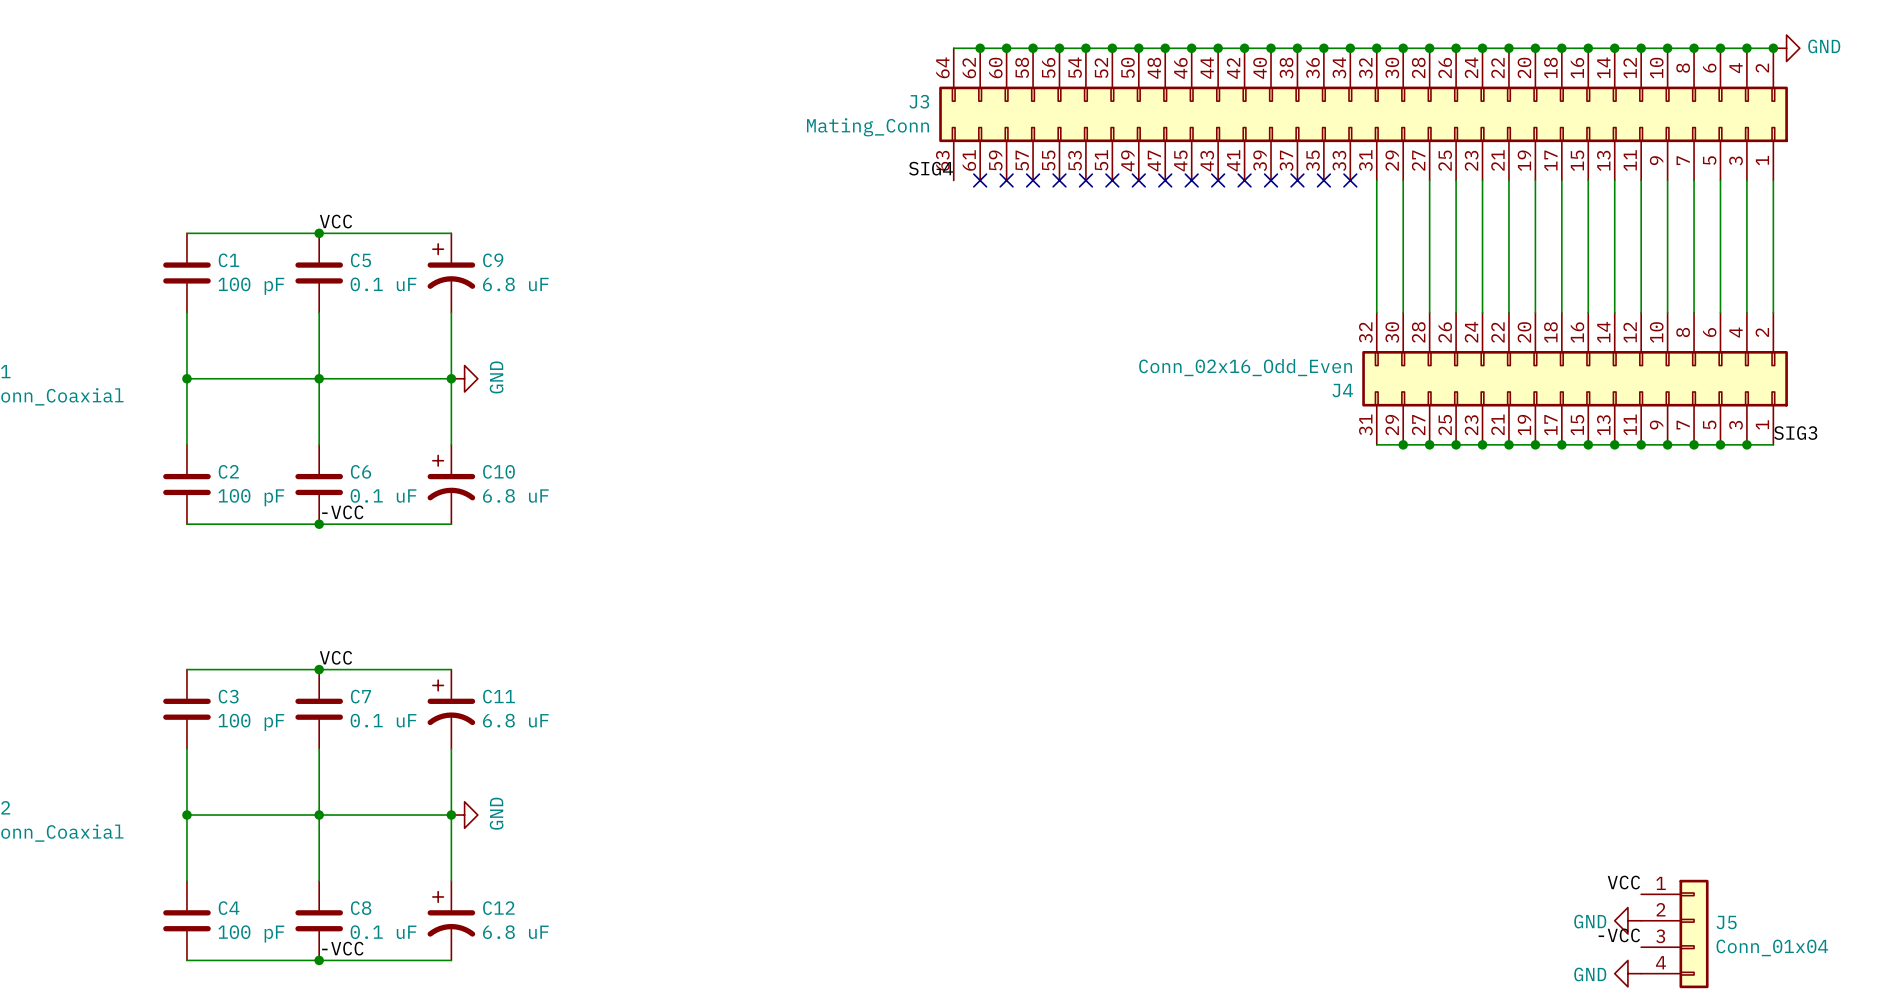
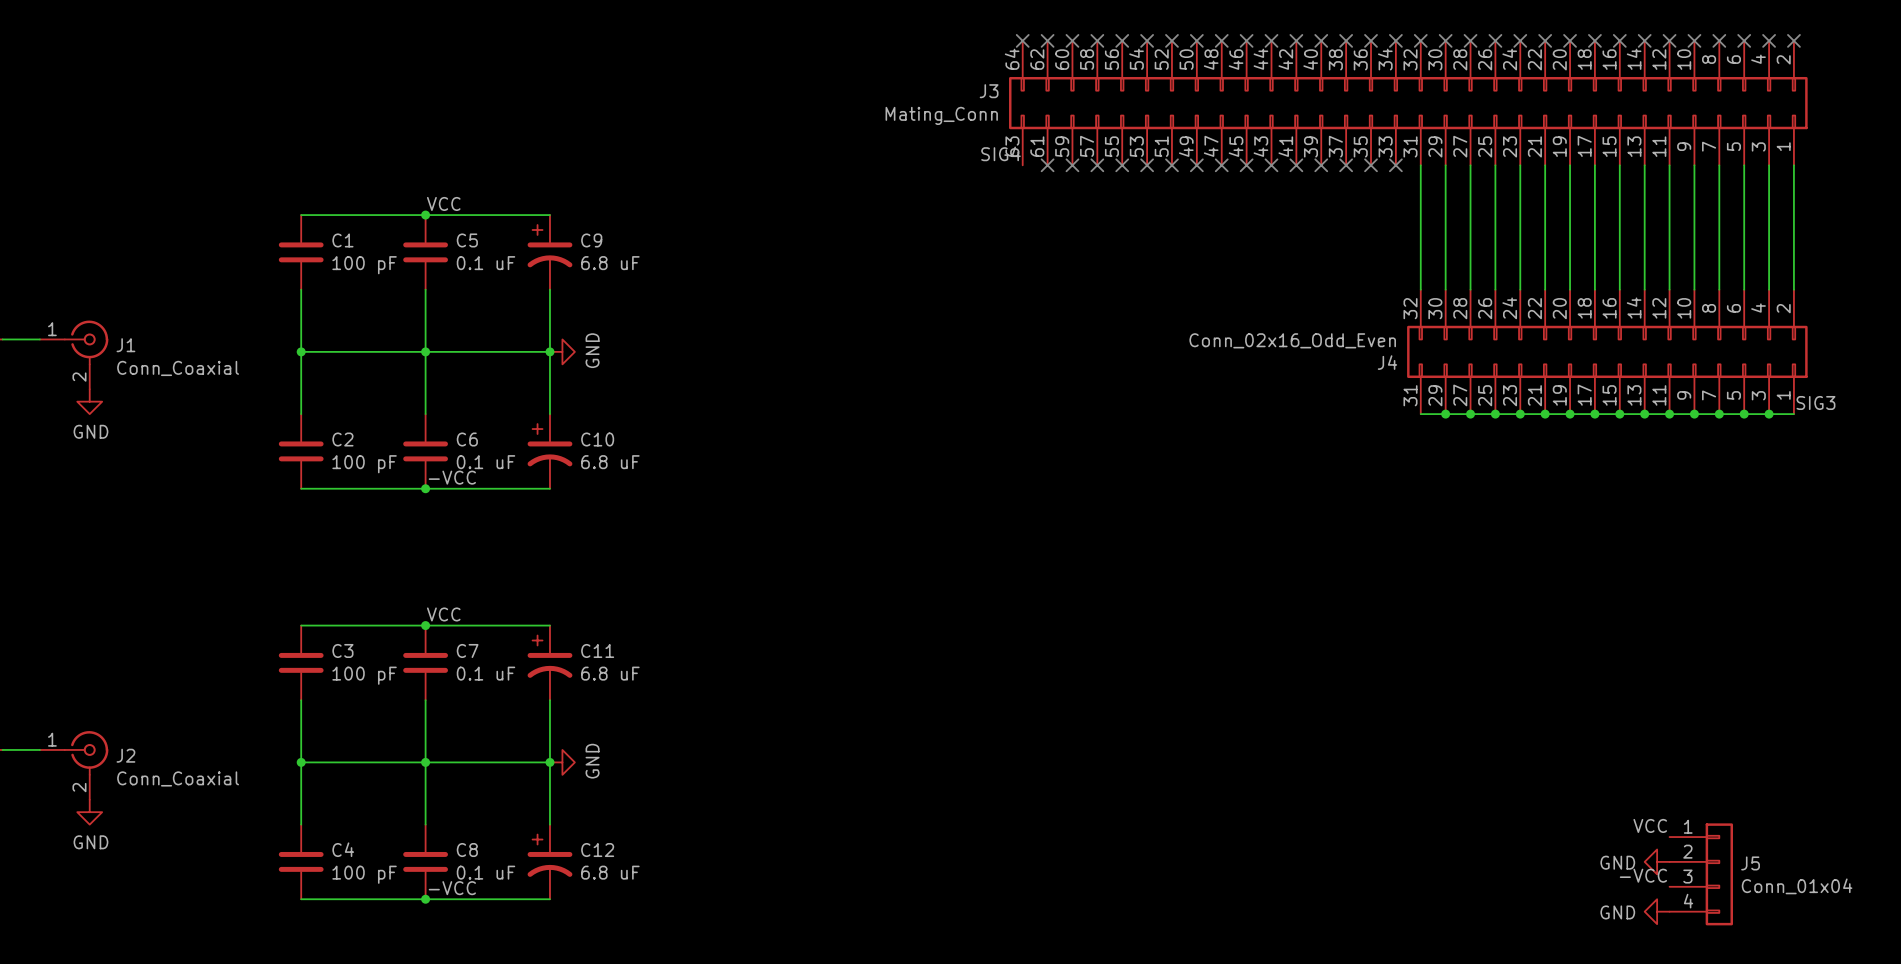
wire: (953, 48) (1773, 48) -> none
no-connect mark: none -> (1022, 40)
junction: (980, 48) -> none
no-connect mark: none -> (1047, 40)
junction: (1006, 48) -> none
no-connect mark: none -> (1072, 40)
junction: (1033, 48) -> none
no-connect mark: none -> (1097, 40)
junction: (1059, 48) -> none
no-connect mark: none -> (1122, 40)
junction: (1085, 48) -> none
no-connect mark: none -> (1147, 40)
junction: (1112, 48) -> none
no-connect mark: none -> (1171, 40)
junction: (1138, 48) -> none
no-connect mark: none -> (1196, 40)
junction: (1165, 48) -> none
no-connect mark: none -> (1221, 40)
junction: (1191, 48) -> none
no-connect mark: none -> (1246, 40)
junction: (1218, 48) -> none
no-connect mark: none -> (1271, 40)
junction: (1244, 48) -> none
no-connect mark: none -> (1296, 40)
junction: (1271, 48) -> none
no-connect mark: none -> (1321, 40)
junction: (1297, 48) -> none
no-connect mark: none -> (1346, 40)
junction: (1323, 48) -> none
no-connect mark: none -> (1371, 40)
junction: (1350, 48) -> none
no-connect mark: none -> (1395, 40)
junction: (1376, 48) -> none
no-connect mark: none -> (1420, 40)
junction: (1403, 48) -> none
no-connect mark: none -> (1445, 40)
junction: (1429, 48) -> none
no-connect mark: none -> (1470, 40)
junction: (1456, 48) -> none
no-connect mark: none -> (1495, 40)
junction: (1482, 48) -> none
no-connect mark: none -> (1520, 40)
junction: (1508, 48) -> none
no-connect mark: none -> (1545, 40)
junction: (1535, 48) -> none
no-connect mark: none -> (1570, 40)
junction: (1561, 48) -> none
no-connect mark: none -> (1594, 40)
junction: (1588, 48) -> none
no-connect mark: none -> (1619, 40)
junction: (1614, 48) -> none
no-connect mark: none -> (1644, 40)
junction: (1641, 48) -> none
no-connect mark: none -> (1669, 40)
junction: (1667, 48) -> none
no-connect mark: none -> (1694, 40)
junction: (1694, 48) -> none
no-connect mark: none -> (1719, 40)
junction: (1720, 48) -> none
no-connect mark: none -> (1744, 40)
junction: (1746, 48) -> none
no-connect mark: none -> (1769, 40)
junction: (1773, 48) -> none
no-connect mark: none -> (1793, 40)
power symbol: GND (1786, 48) -> none

